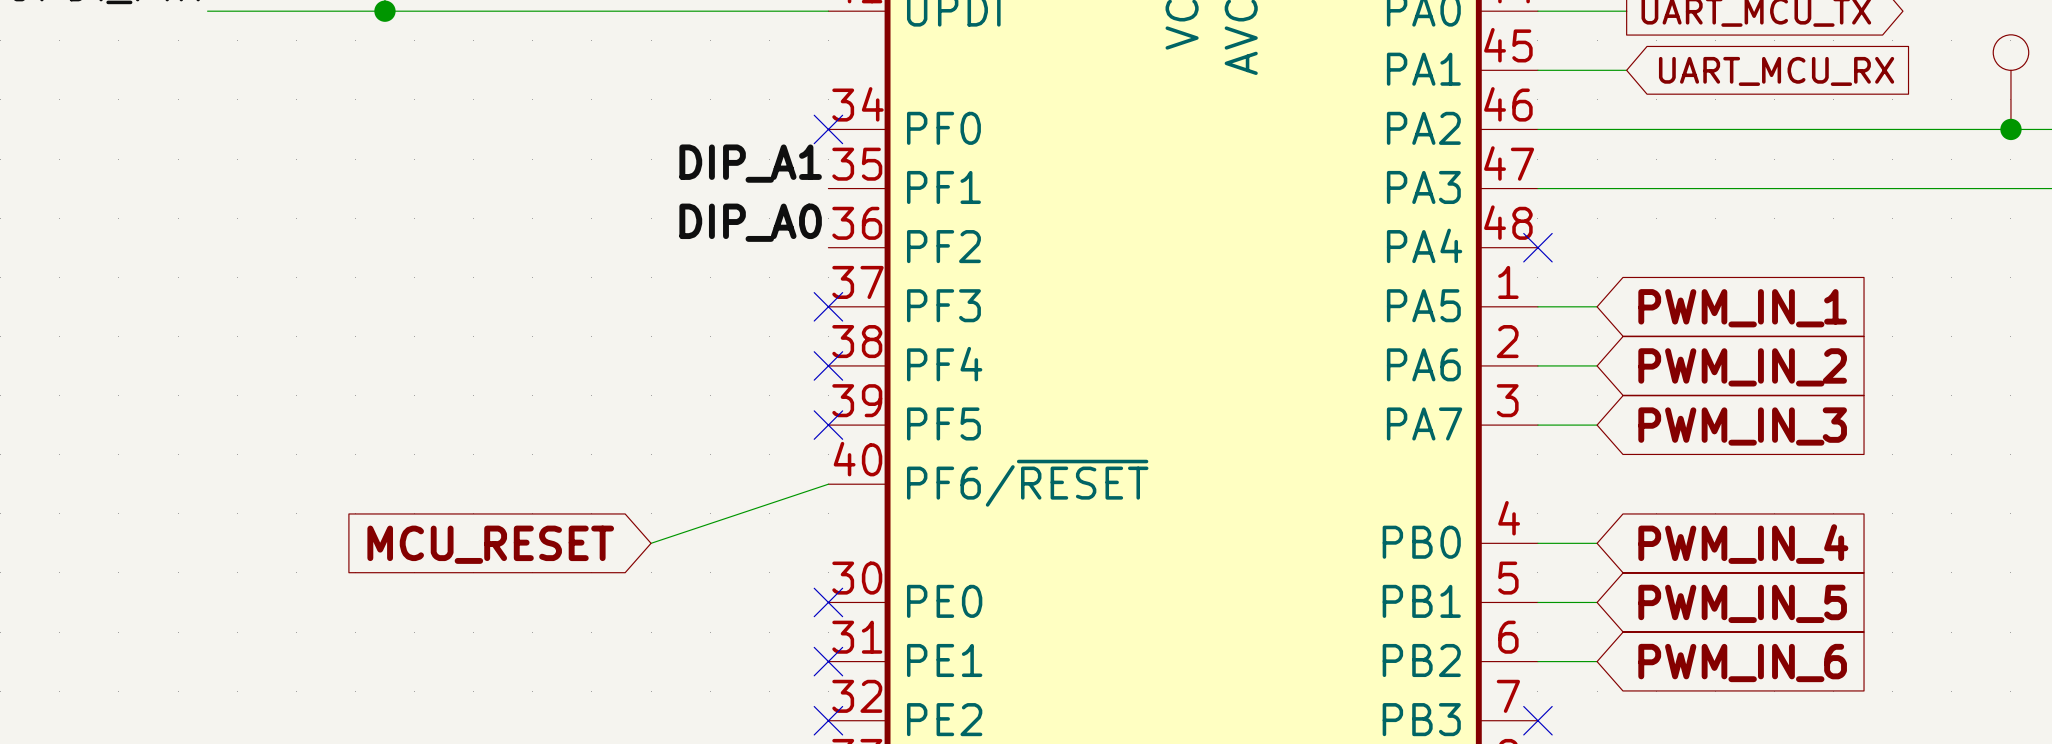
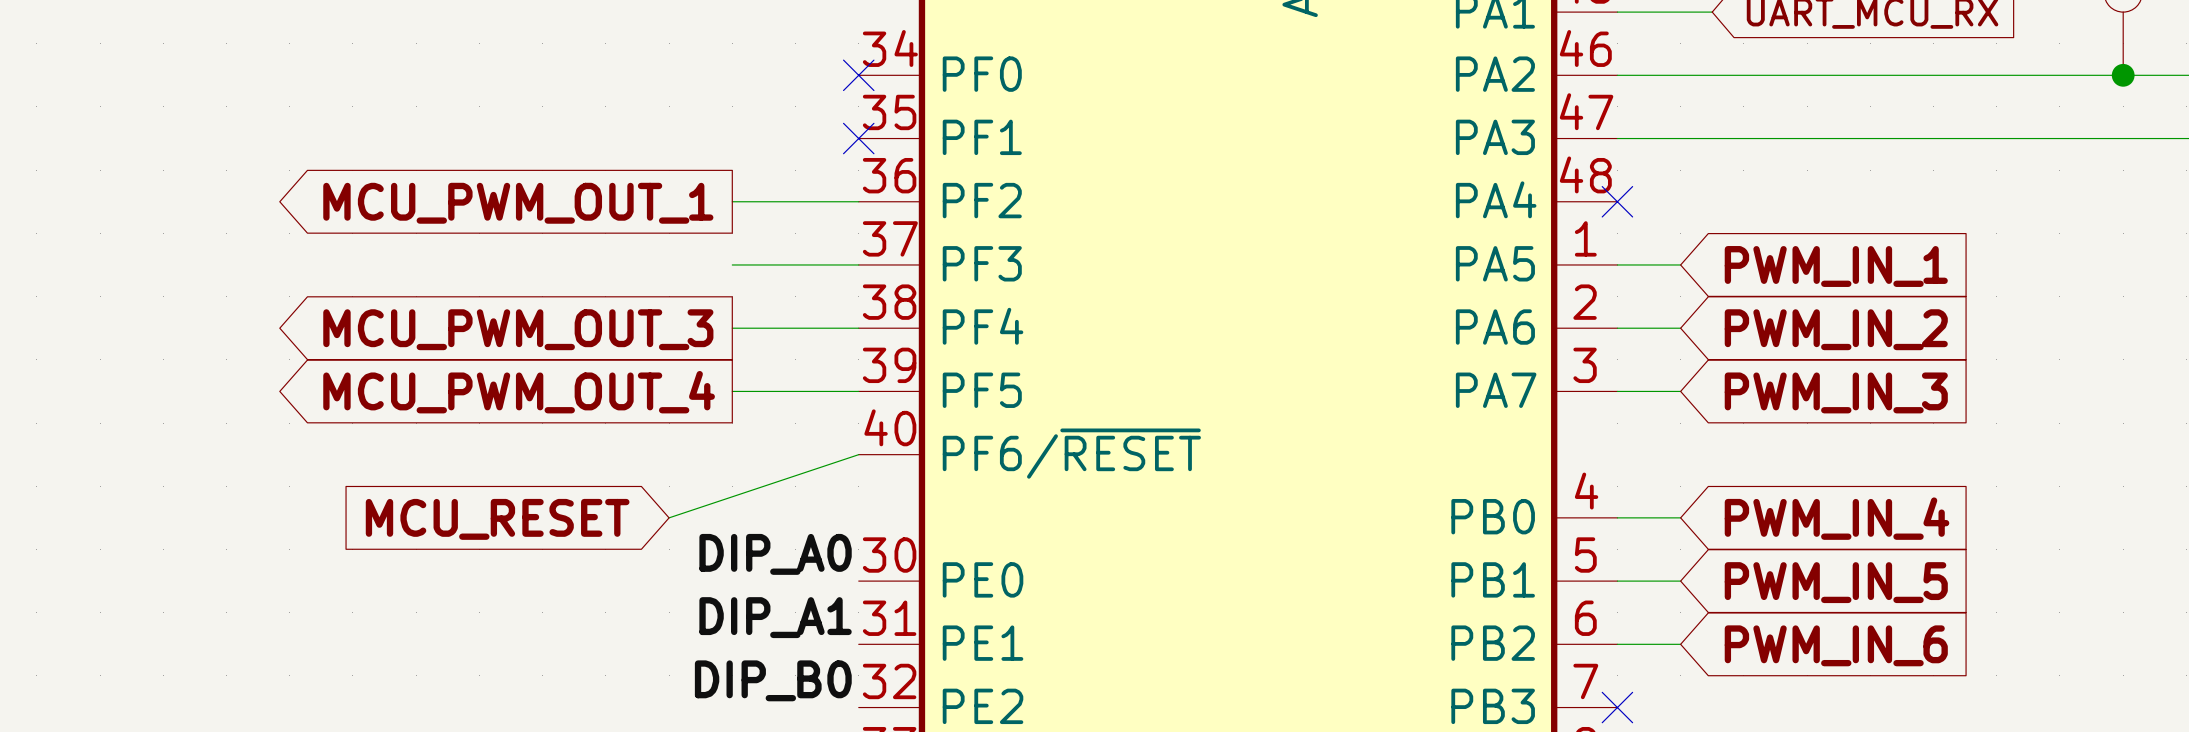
label position: DIP_A1 (750, 163) -> DIP_A1 (775, 617)
no-connect mark: none -> (858, 138)
label position: DIP_A0 (750, 222) -> DIP_A0 (775, 554)
wire: none -> (732, 201) (858, 201)
global label: none -> MCU_PWM_OUT_1 (518, 203)
wire: none -> (732, 264) (858, 264)
no-connect mark: (828, 306) -> none
wire: none -> (732, 328) (858, 328)
no-connect mark: (828, 365) -> none
global label: none -> MCU_PWM_OUT_3 (518, 329)
global label: none -> MCU_PWM_OUT_4 (519, 392)
wire: none -> (732, 391) (858, 391)
no-connect mark: (828, 425) -> none
no-connect mark: (828, 602) -> none
no-connect mark: (828, 661) -> none
label: none -> DIP_B0 (773, 680)
no-connect mark: (828, 720) -> none

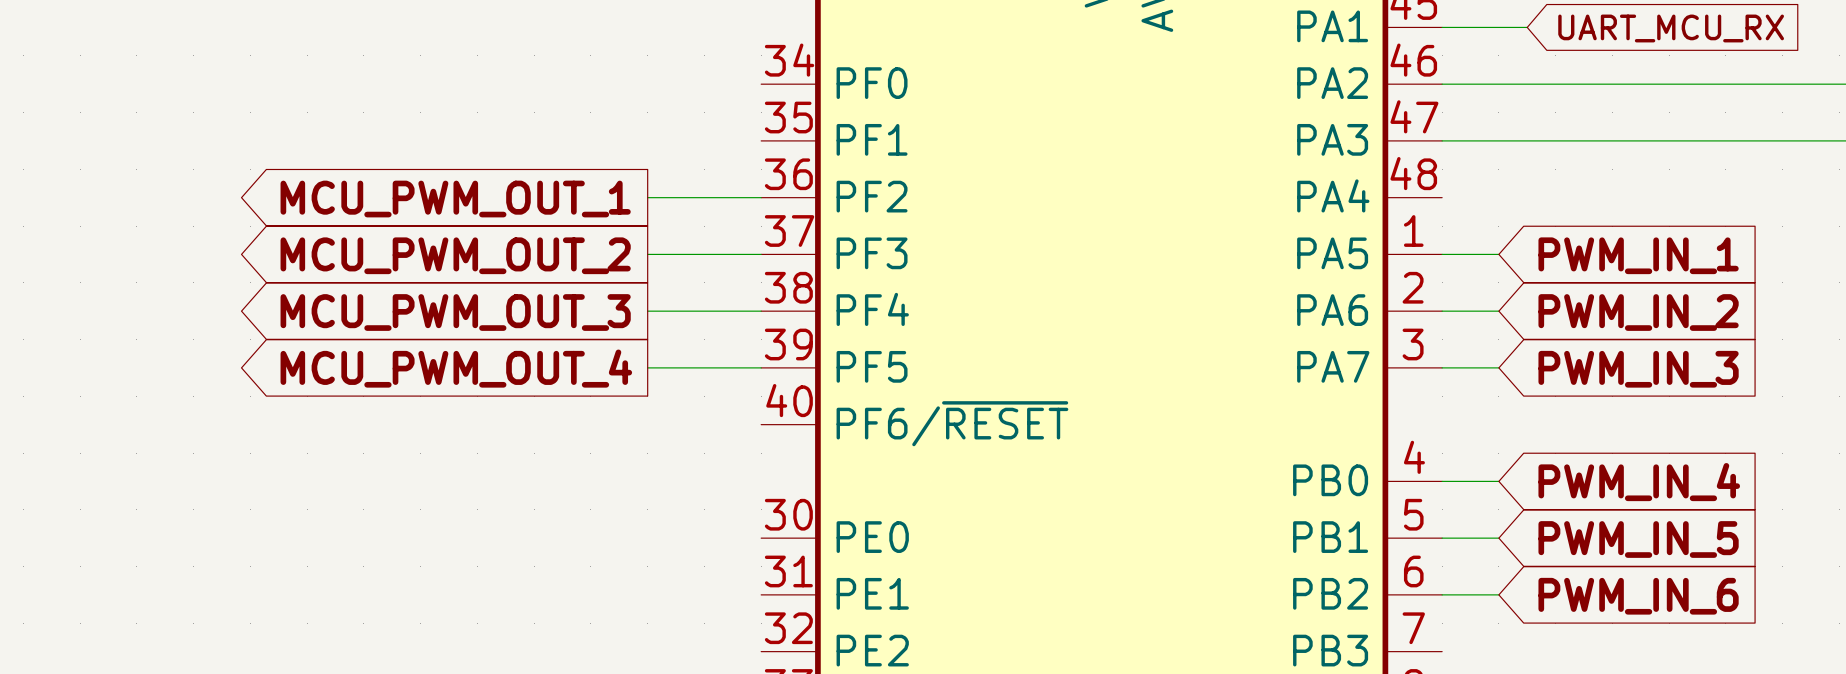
no-connect mark: (858, 75) -> none
no-connect mark: (858, 138) -> none
no-connect mark: (1617, 201) -> none
global label: none -> MCU_PWM_OUT_2 (455, 255)
wire: (858, 454) (669, 517) -> none
global label: MCU_RESET (497, 519) -> none
label: DIP_A0 (775, 554) -> none
label: DIP_A1 (775, 617) -> none
label: DIP_B0 (773, 680) -> none
no-connect mark: (1617, 707) -> none

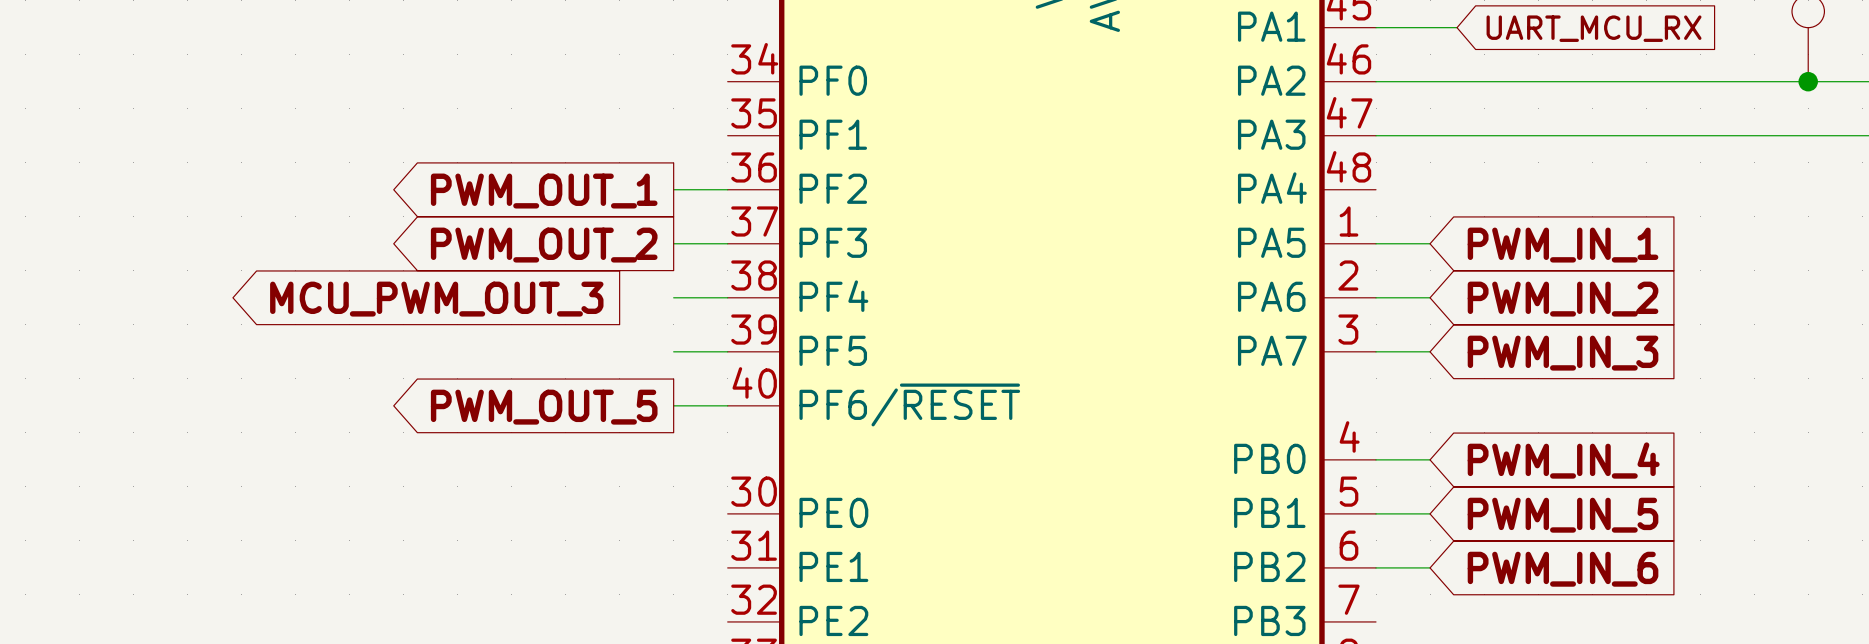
wire: (647, 197) (704, 197) -> none
global label: MCU_PWM_OUT_1 (455, 199) -> none
global label: none -> PWM_OUT_1 (544, 191)
wire: (647, 254) (704, 254) -> none
global label: MCU_PWM_OUT_2 (455, 255) -> none
global label: none -> PWM_OUT_2 (544, 245)
wire: (647, 311) (704, 311) -> none
wire: (647, 367) (704, 367) -> (673, 405) (727, 405)
global label: MCU_PWM_OUT_4 (456, 368) -> PWM_OUT_5 (544, 407)

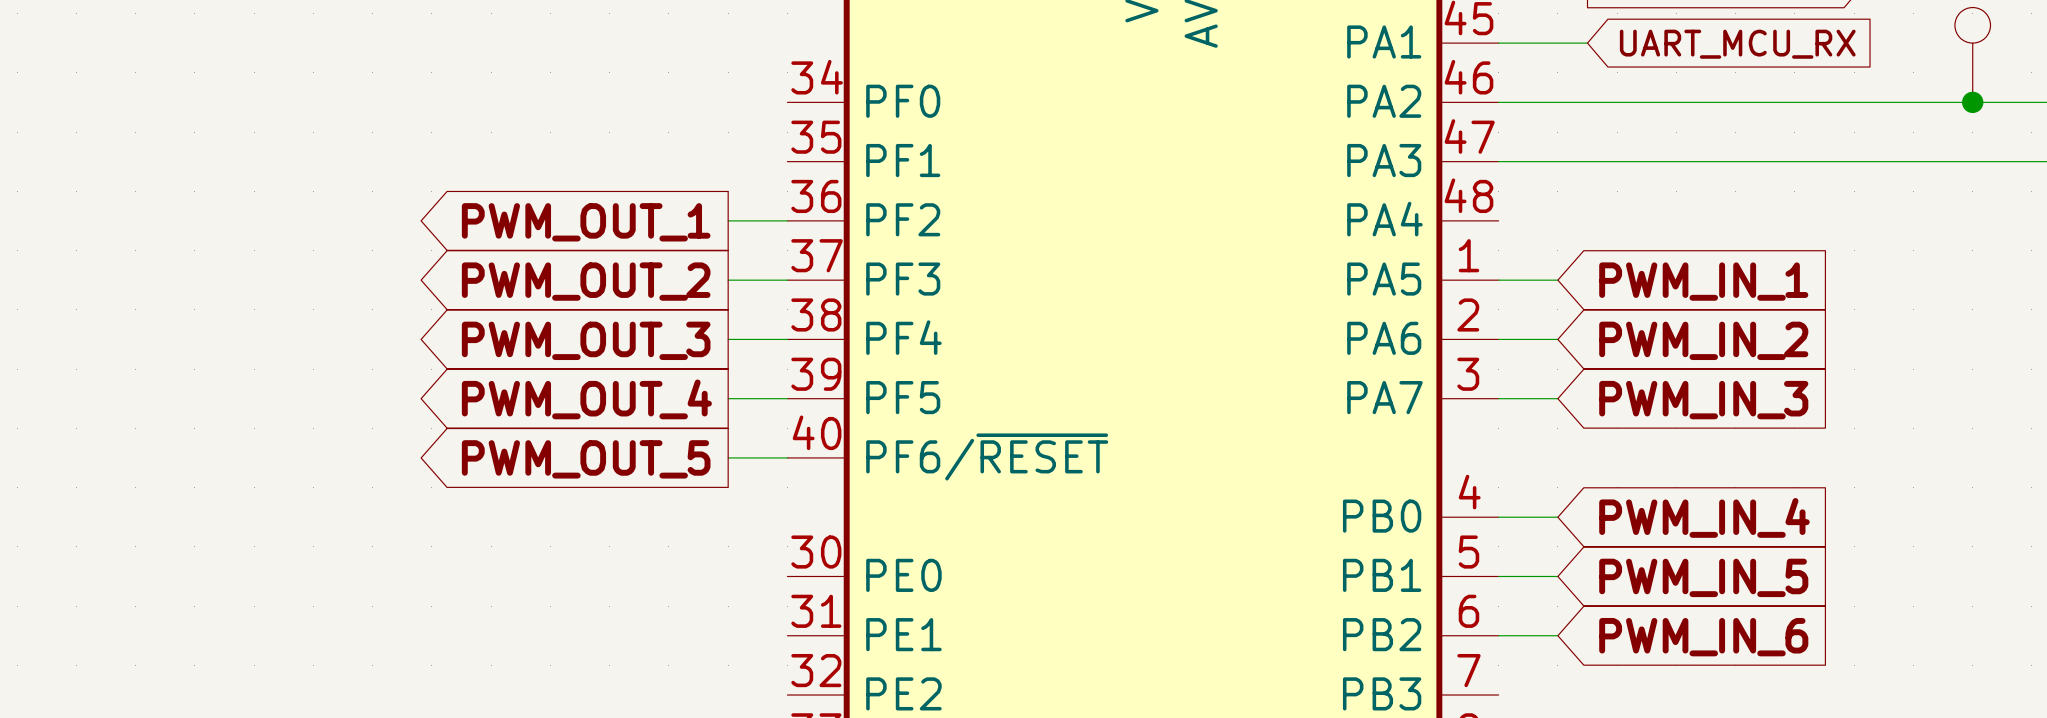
global label: MCU_PWM_OUT_3 (436, 299) -> none
global label: none -> PWM_OUT_3 (586, 340)
global label: none -> PWM_OUT_4 (586, 399)

